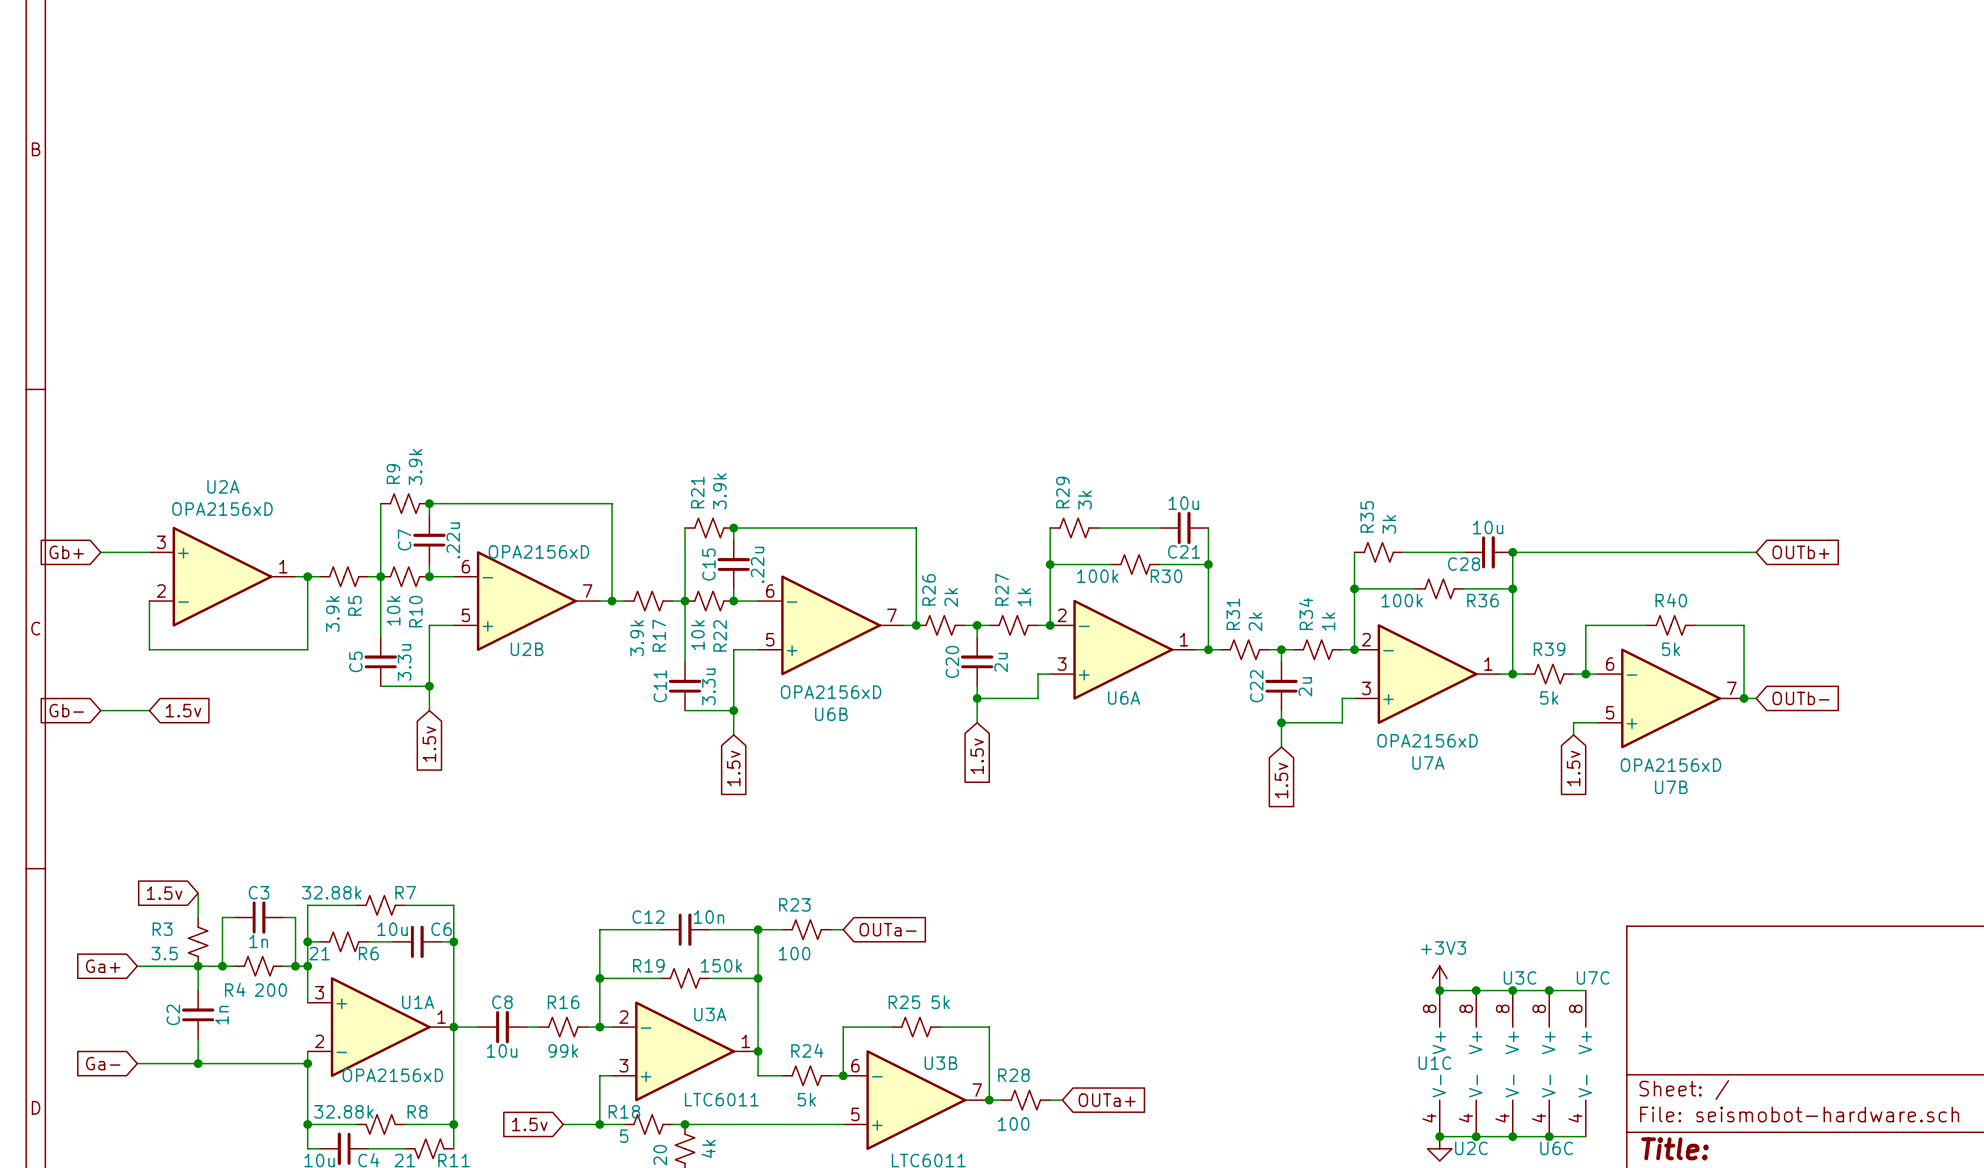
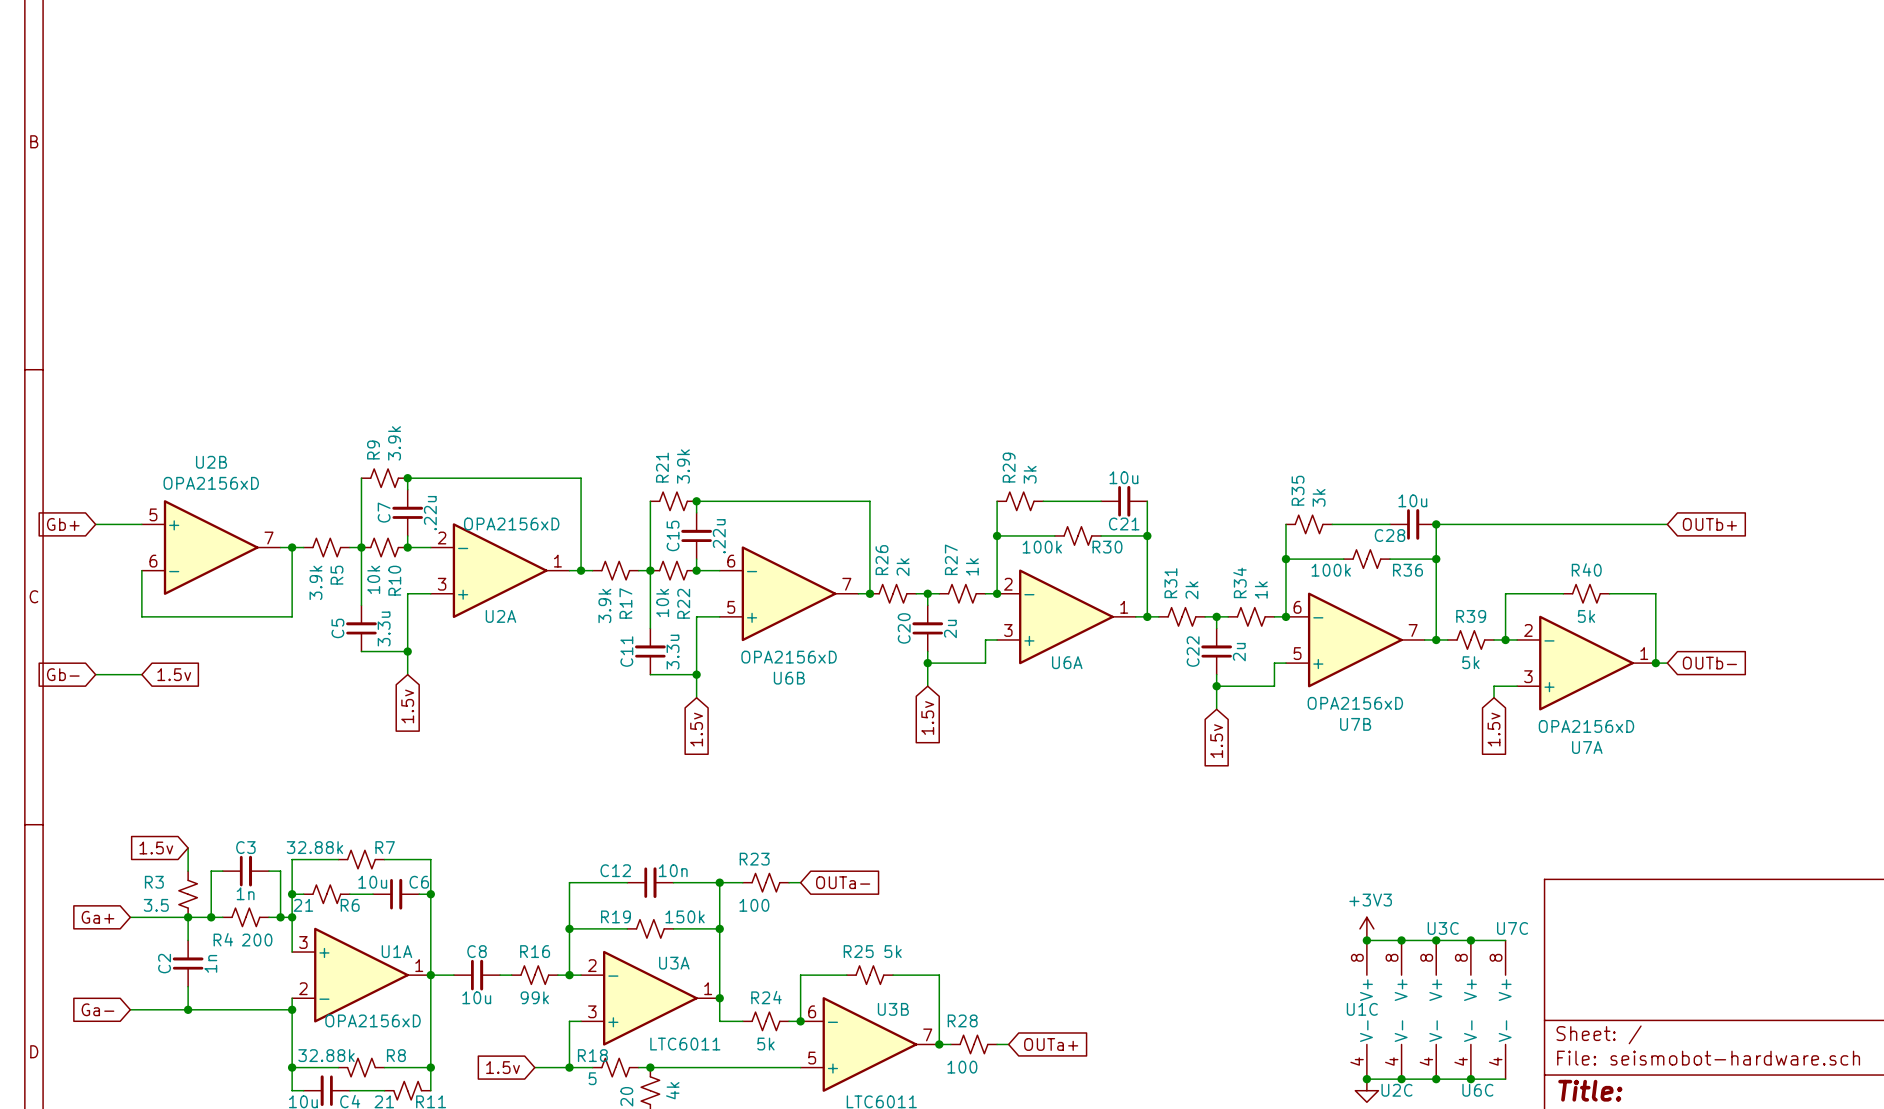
U2A name position: U2A (223, 486) -> U2A (500, 616)
U2A flip: as is (222, 576) -> up-down (500, 570)
U2A position: (222, 576) -> (500, 570)
U2B flip: as is (526, 601) -> up-down (211, 547)
U2B position: (526, 601) -> (211, 547)
U2B name position: U2B (527, 649) -> U2B (211, 462)
U7A position: (1427, 674) -> (1586, 663)
U7B position: (1670, 698) -> (1355, 639)

